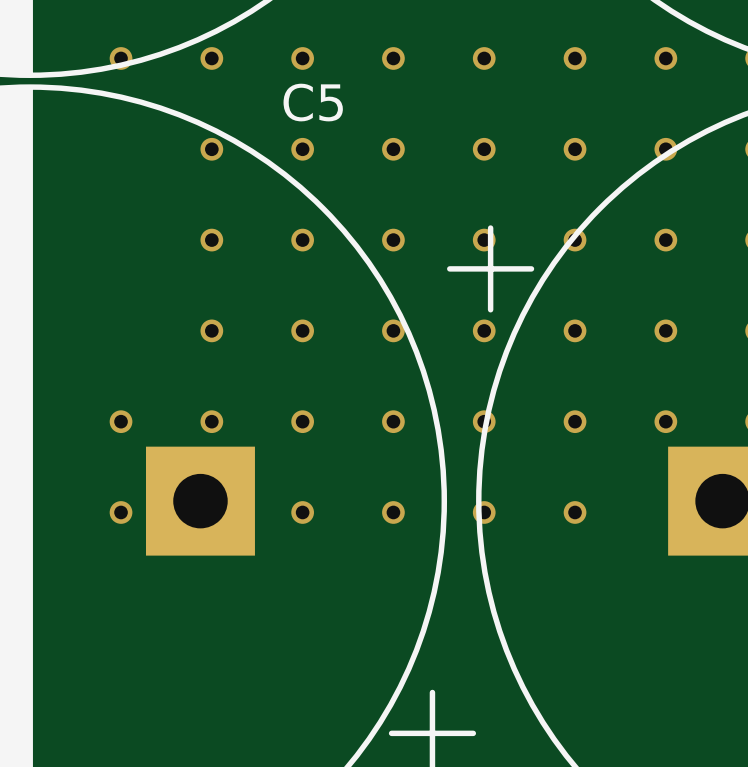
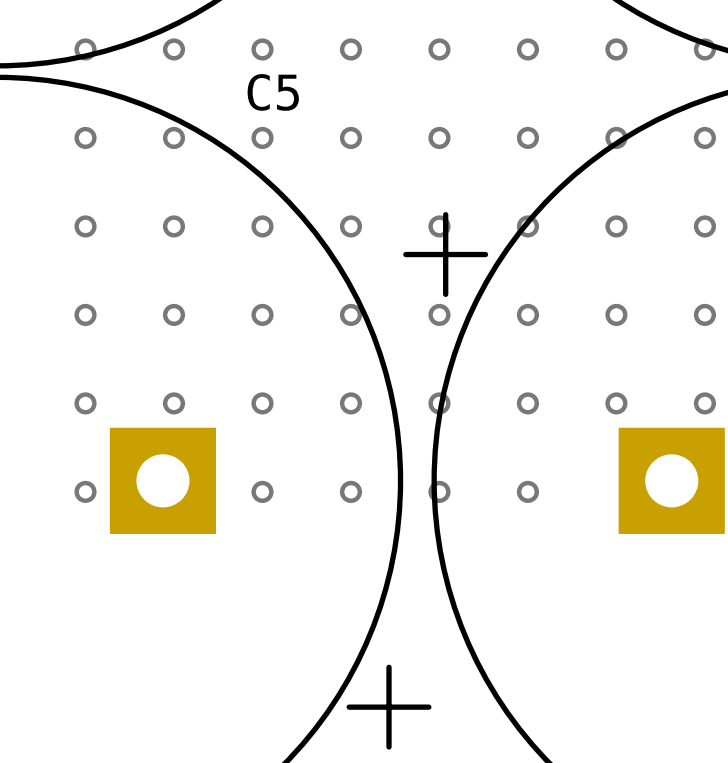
via: none -> (85, 137)
via: none -> (85, 226)
via: none -> (85, 314)

